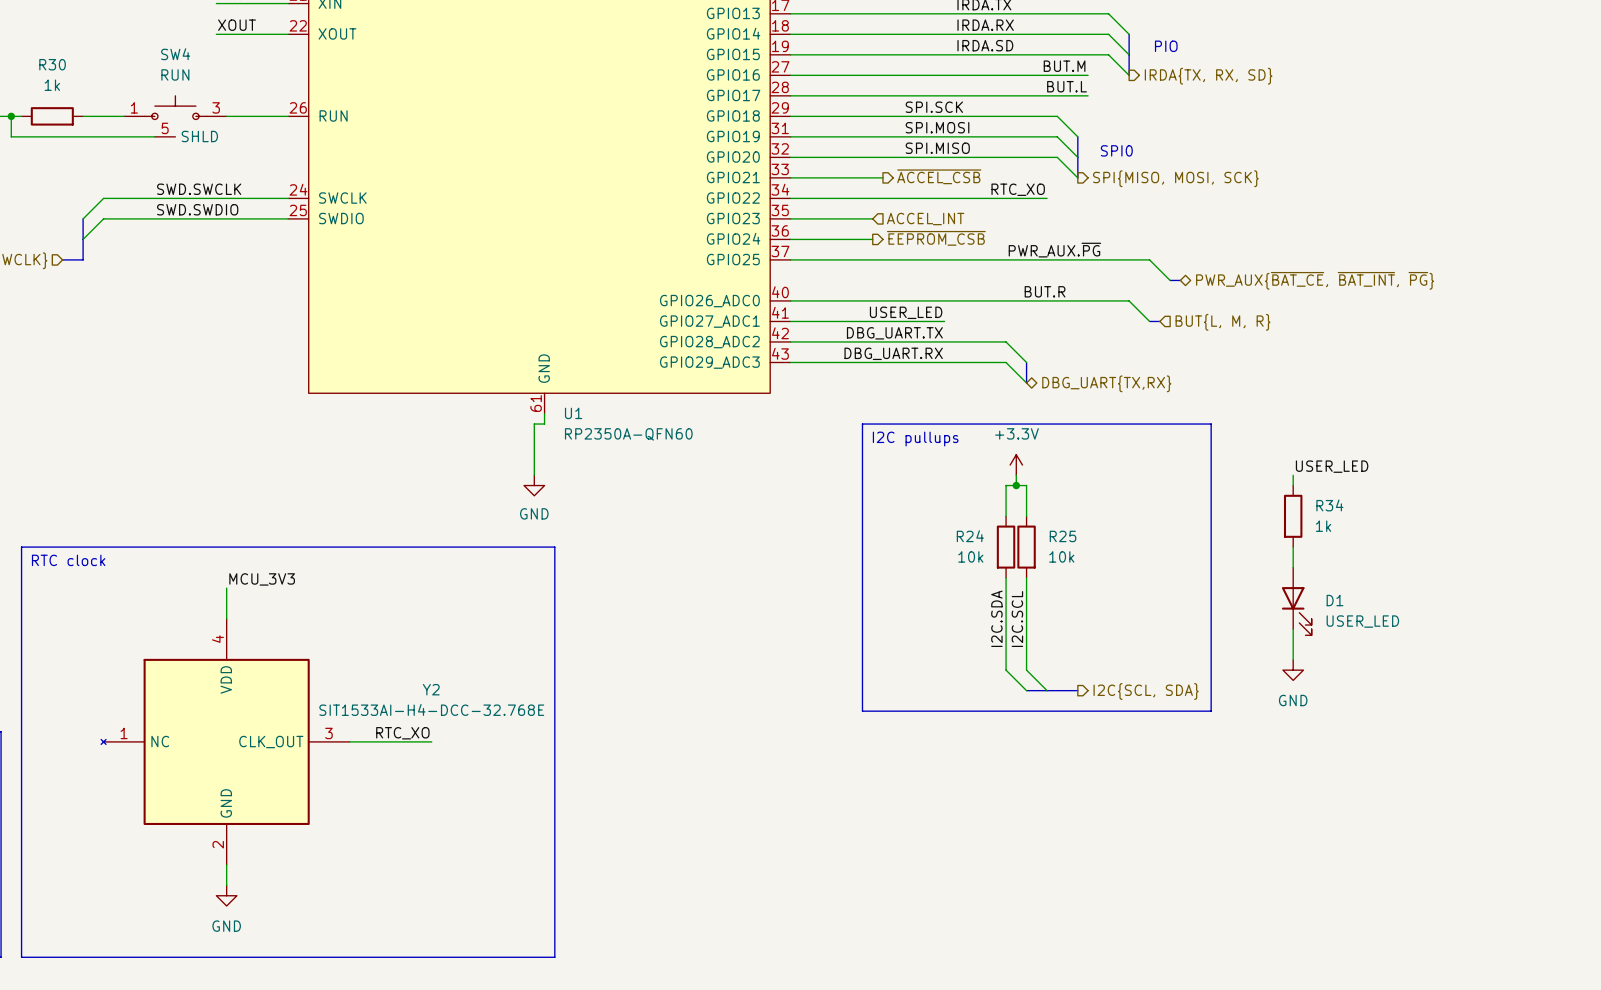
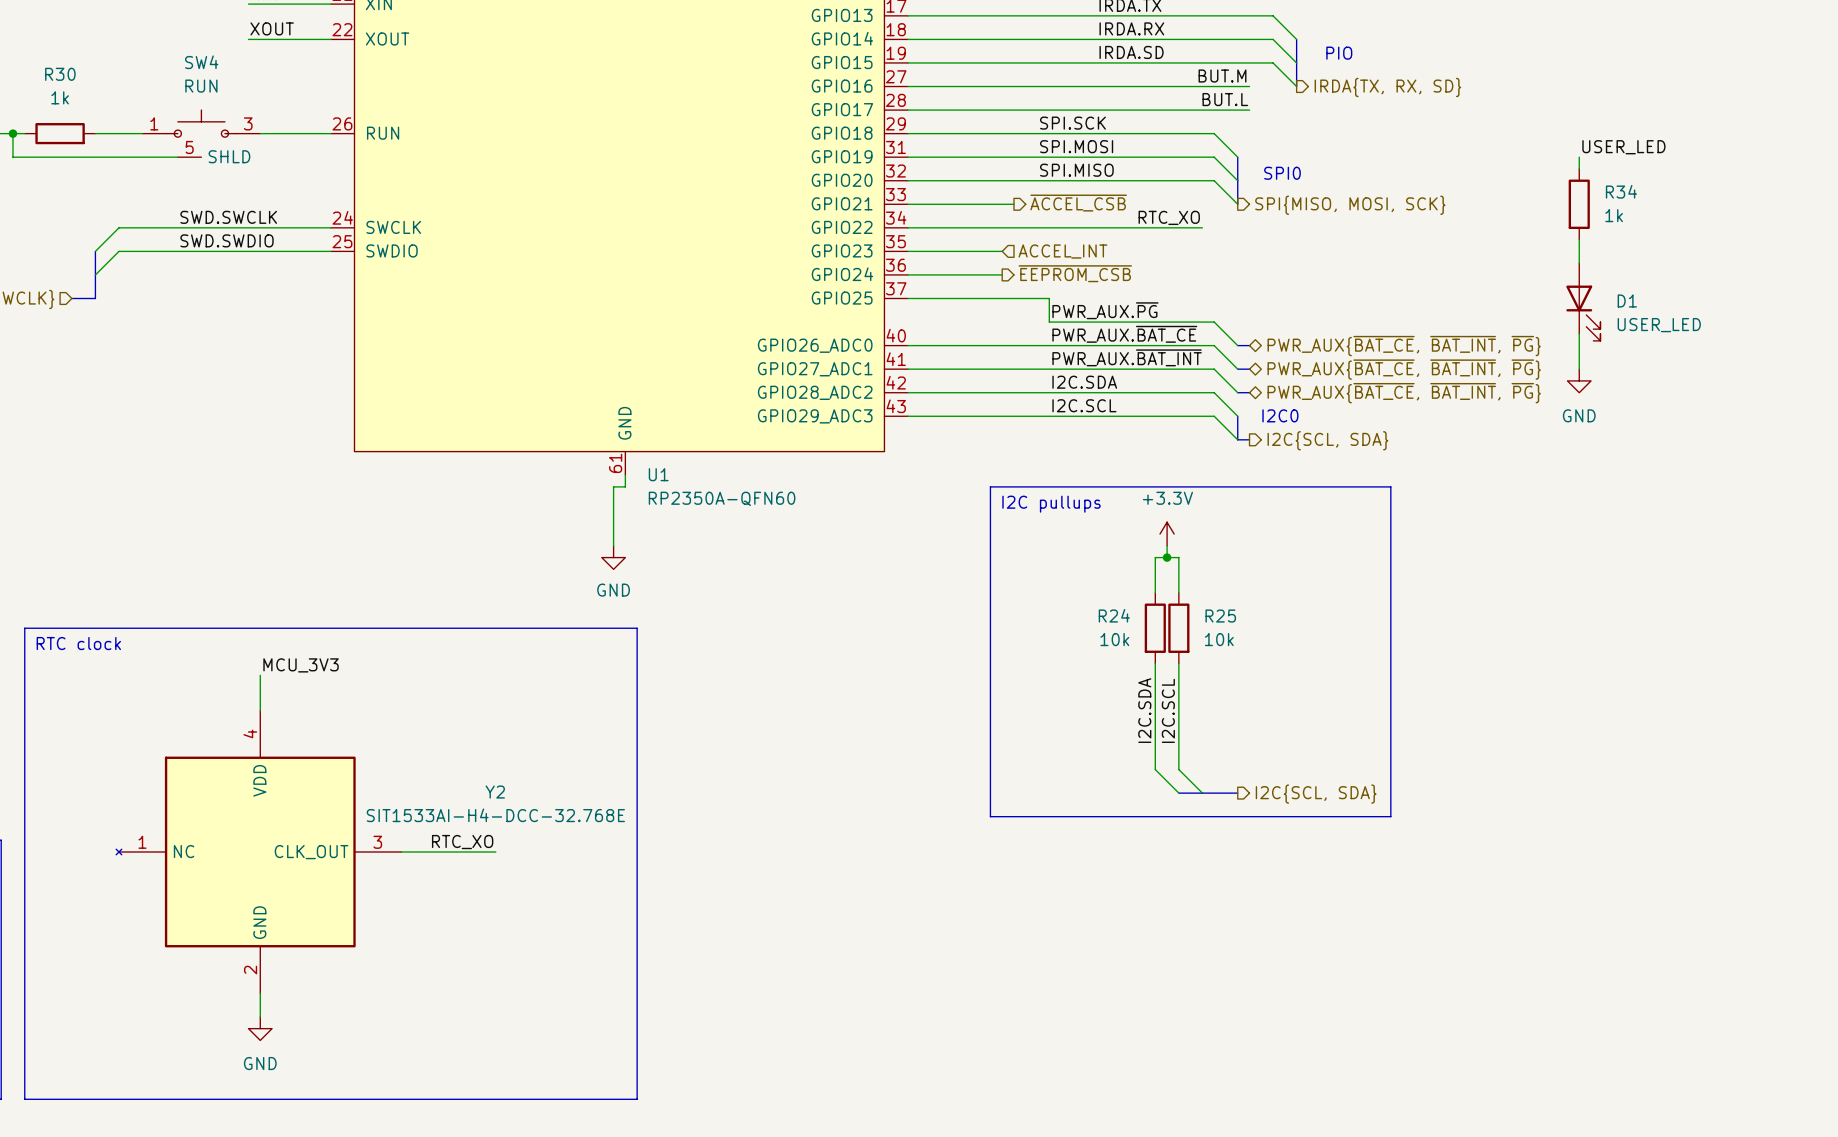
label: none -> USER_LED (1623, 147)
wire: none -> (1579, 157) (1579, 168)
wire: none -> (1579, 239) (1579, 263)
label position: PWR_AUX.~{PG} (1054, 250) -> PWR_AUX.~{PG} (1105, 310)
wire: (913, 259) (1149, 259) (1170, 280) -> (1049, 298) (1049, 322) (1214, 322) (1237, 345)
bus: (1170, 280) (1180, 280) -> (1237, 345) (1249, 345)
hierarchical label position: PWR_AUX{~{BAT_CE}, ~{BAT_INT}, ~{PG}} (1315, 280) -> PWR_AUX{~{BAT_CE}, ~{BAT_INT}, ~{PG}} (1404, 346)
wire: none -> (1579, 333) (1579, 369)
label: none -> PWR_AUX.~{BAT_CE} (1124, 334)
label: BUT.R (1045, 291) -> none
wire: (1057, 300) (1129, 300) (1149, 321) -> (1214, 345) (1237, 369)
label: none -> PWR_AUX.~{BAT_INT} (1127, 357)
label: USER_LED (906, 312) -> none
wire: none -> (1084, 369) (1214, 369) (1237, 392)
bus: (1149, 321) (1159, 321) -> (1237, 369) (1249, 369)
hierarchical label: none -> PWR_AUX{~{BAT_CE}, ~{BAT_INT}, ~{PG}} (1404, 369)
hierarchical label: BUT{L, M, R} (1223, 322) -> none
power symbol: none -> GND (1579, 380)
label: none -> I2C.SDA (1084, 382)
label: DBG_UART.TX (894, 333) -> none
wire: (1006, 341) (1026, 362) -> (1155, 392) (1214, 392) (1237, 416)
bus: none -> (1237, 392) (1249, 392)
hierarchical label: none -> PWR_AUX{~{BAT_CE}, ~{BAT_INT}, ~{PG}} (1404, 393)
label: DBG_UART.RX (893, 353) -> none
label: none -> I2C.SCL (1084, 405)
wire: (1006, 362) (1026, 383) -> (1155, 416) (1214, 416) (1237, 439)
bus: (1026, 362) (1026, 383) -> none
bus: none -> (1237, 416) (1237, 439) (1249, 439)
text: none -> I2C0 (1280, 415)
hierarchical label: DBG_UART{TX,RX} (1106, 383) -> none
hierarchical label: none -> I2C{SCL, SDA} (1327, 440)
label: USER_LED (1332, 466) -> none
wire: (1293, 475) (1293, 485) -> none
R34 position: (1293, 516) -> (1579, 204)
wire: (1293, 547) (1293, 567) -> none
D1 position: (1296, 601) -> (1583, 302)
wire: (1293, 629) (1293, 659) -> none
power symbol: GND (1293, 670) -> none

